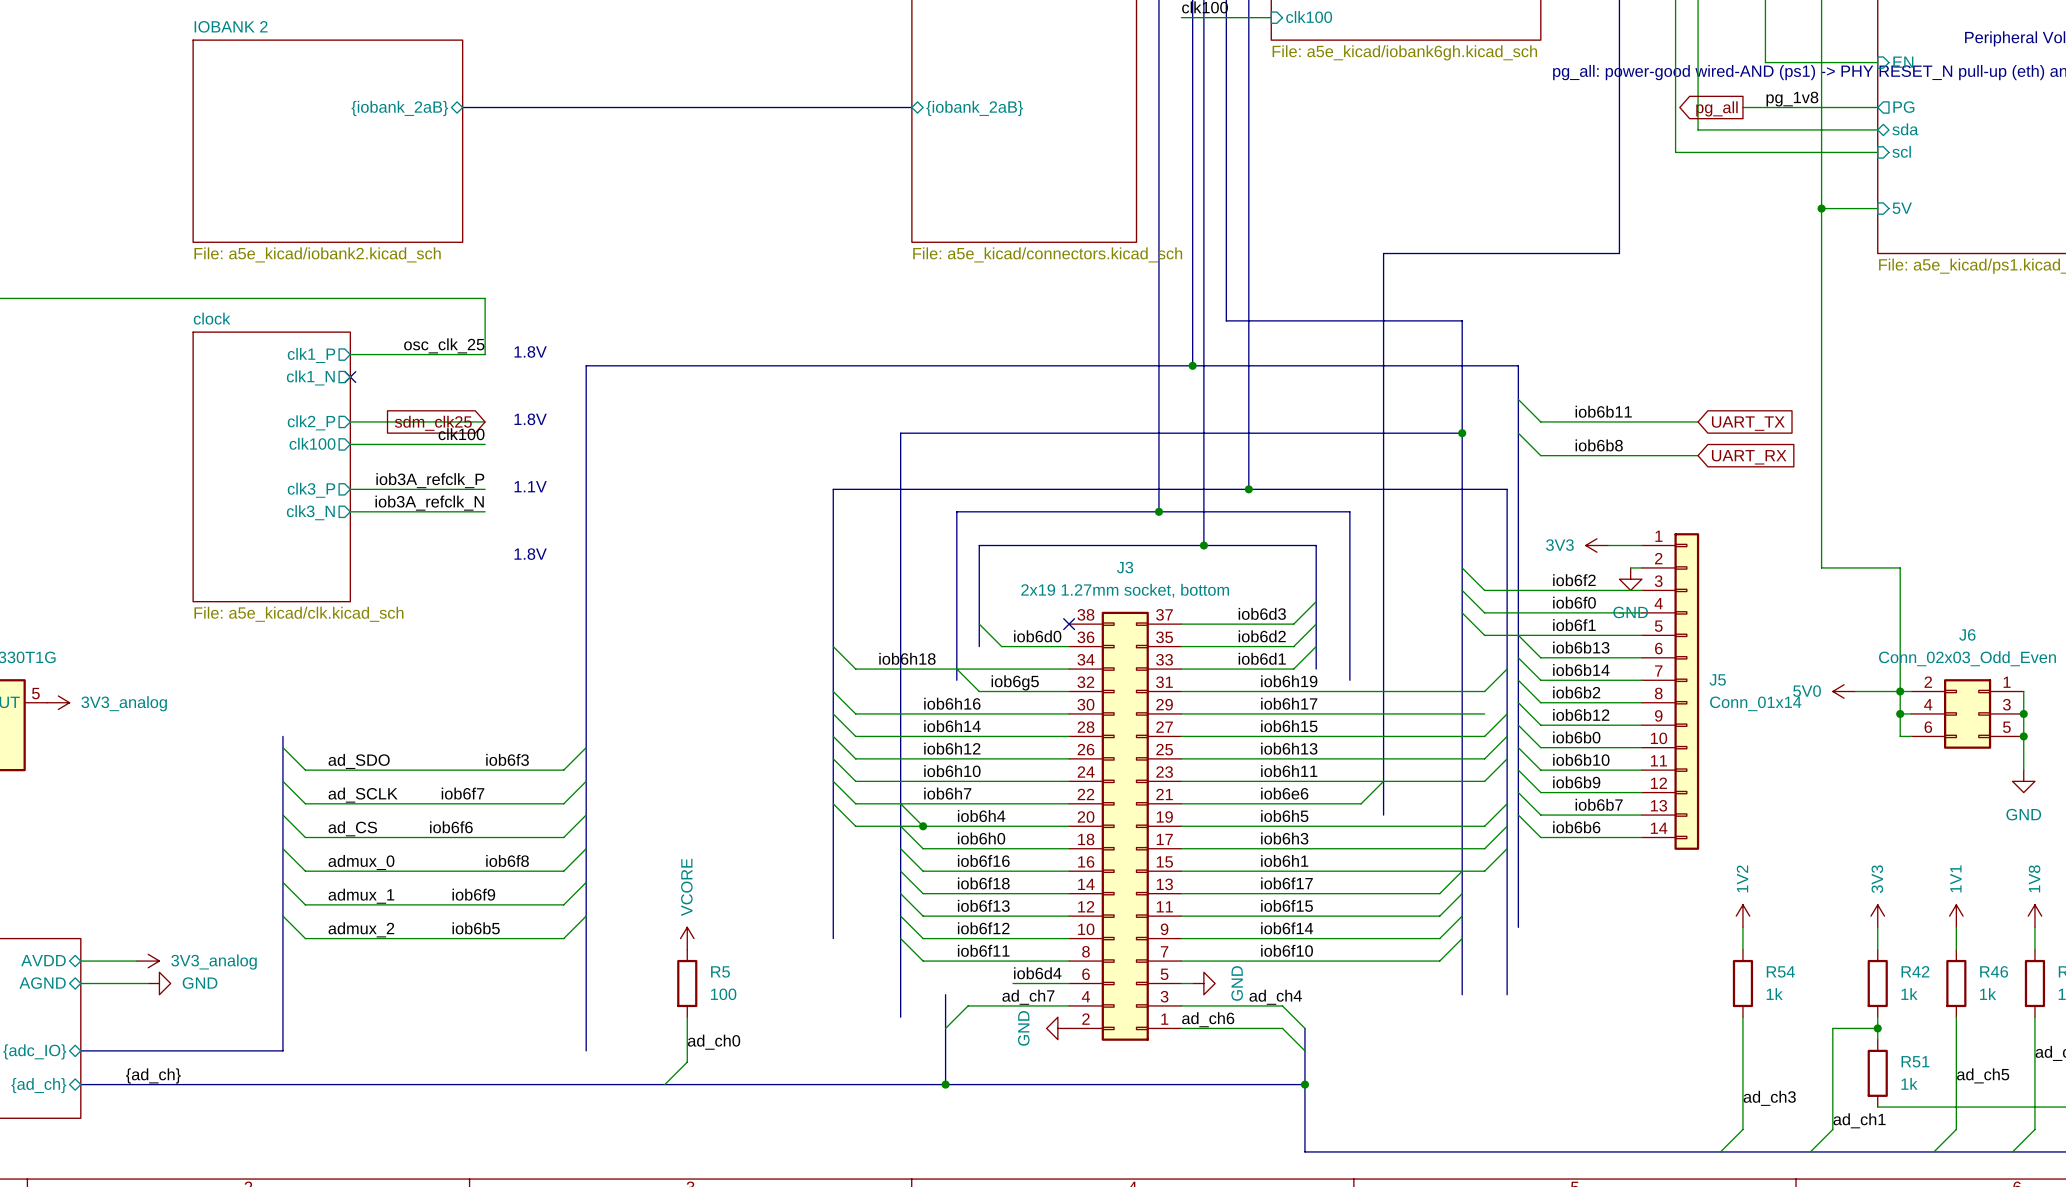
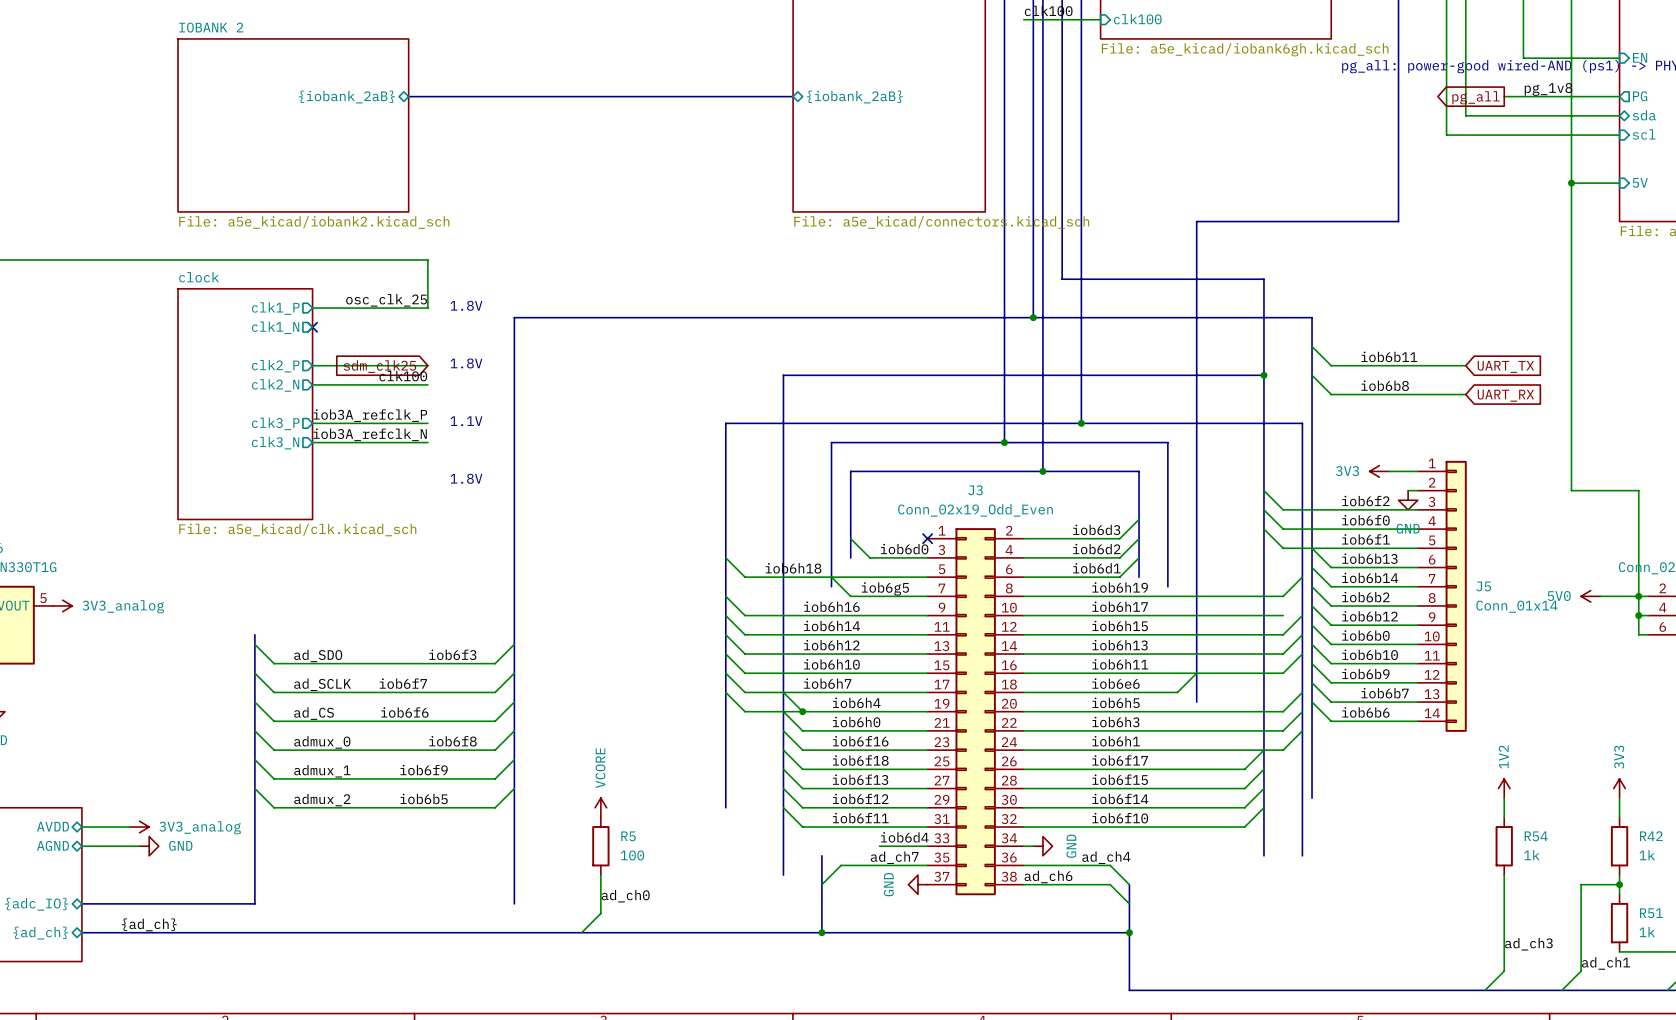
sheet pin: clk100 (312, 443) -> clk2_N (275, 385)
J3 value: 2x19 1.27mm socket, bottom (1125, 590) -> Conn_02x19_Odd_Even (975, 510)
J3 rotation: 0° (1125, 826) -> 180° (975, 711)

